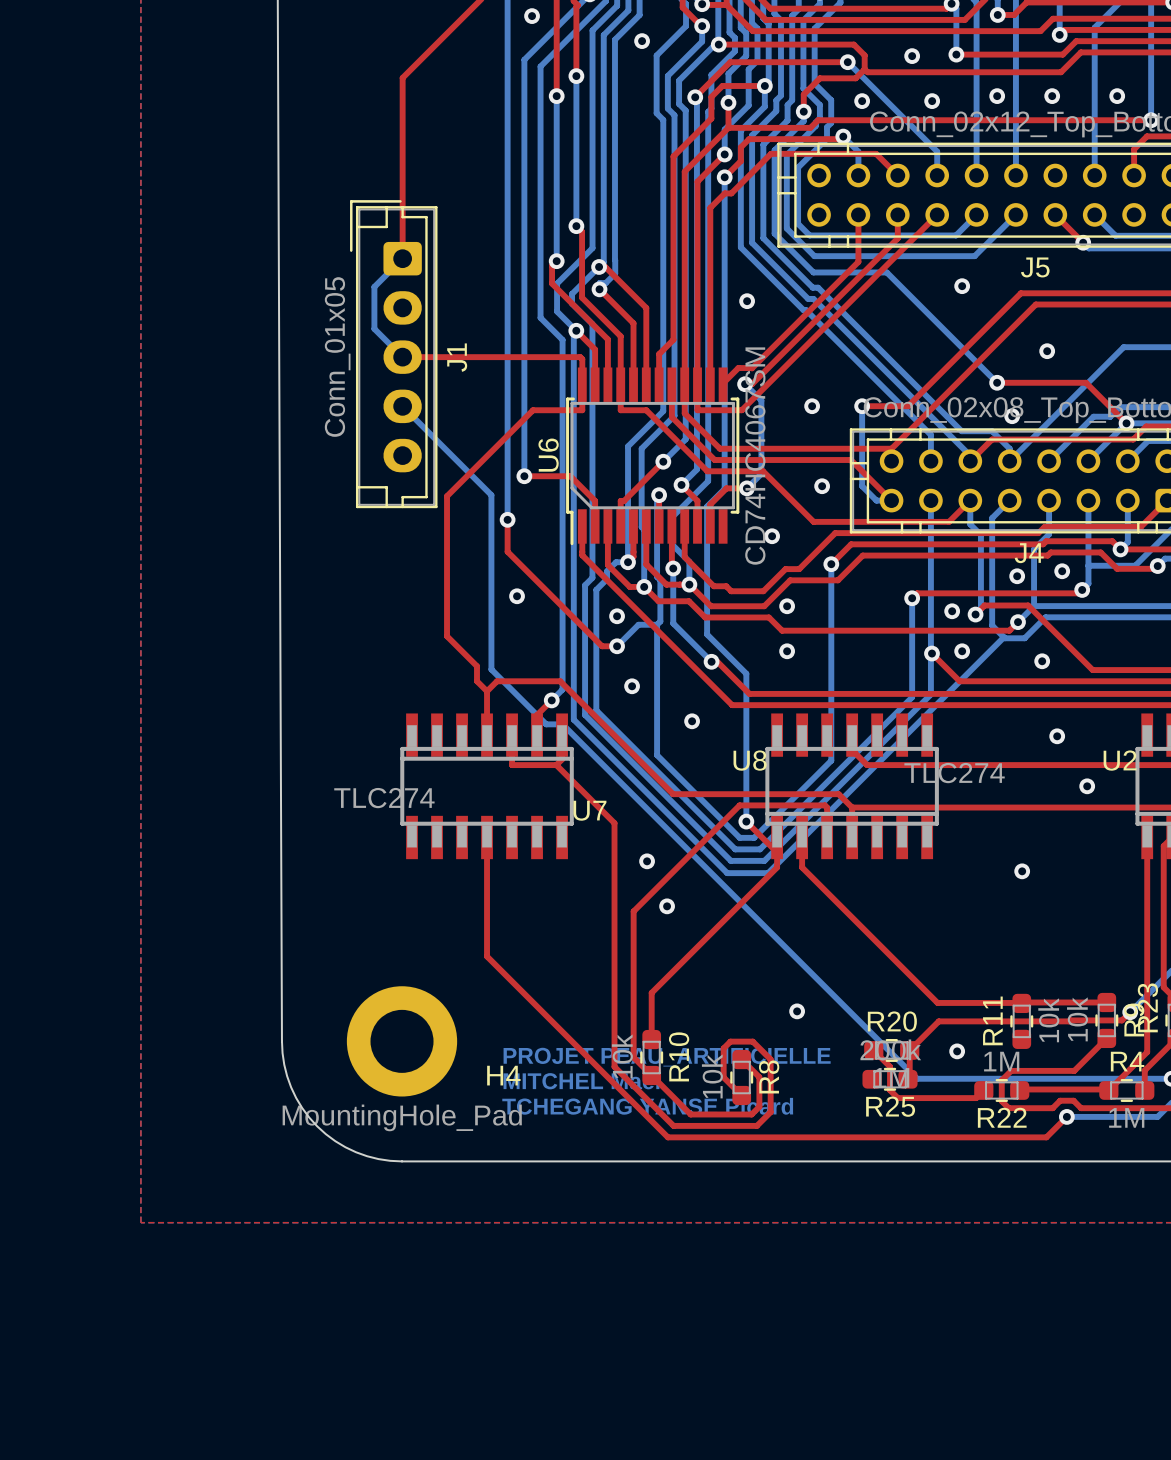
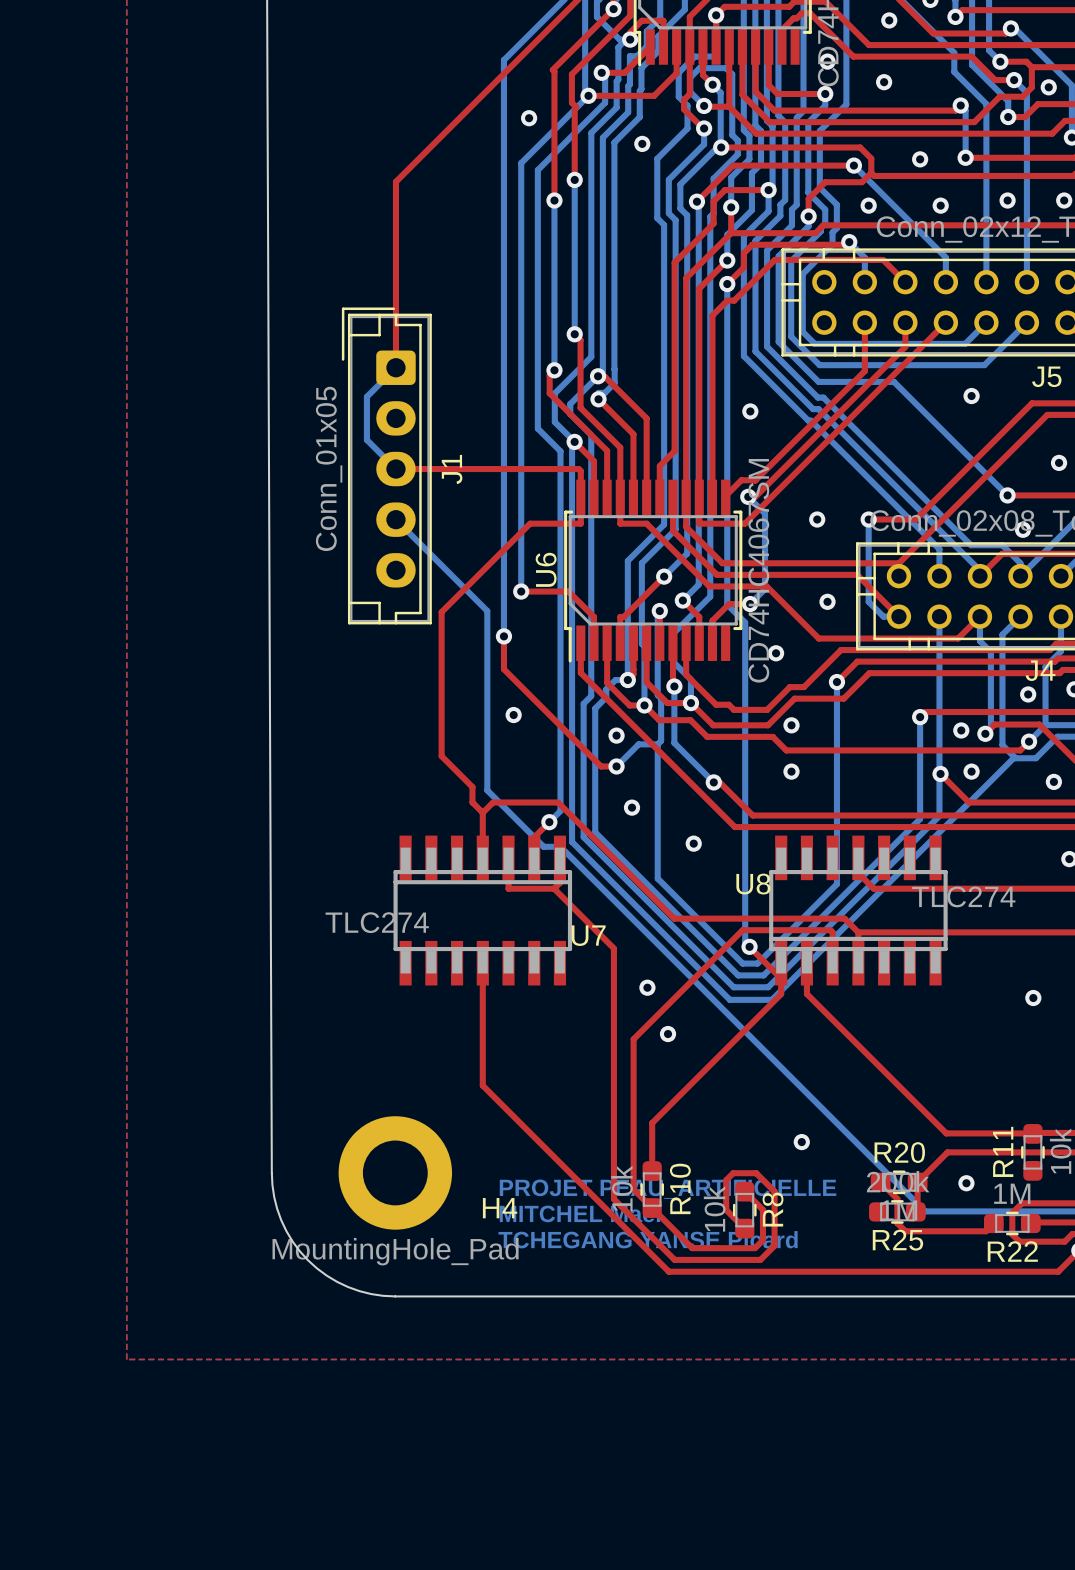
bottom track: (724, 488) (707, 506) (707, 634) (746, 673) (746, 821) -> (727, 604) (745, 622) (745, 942) (749, 946)

